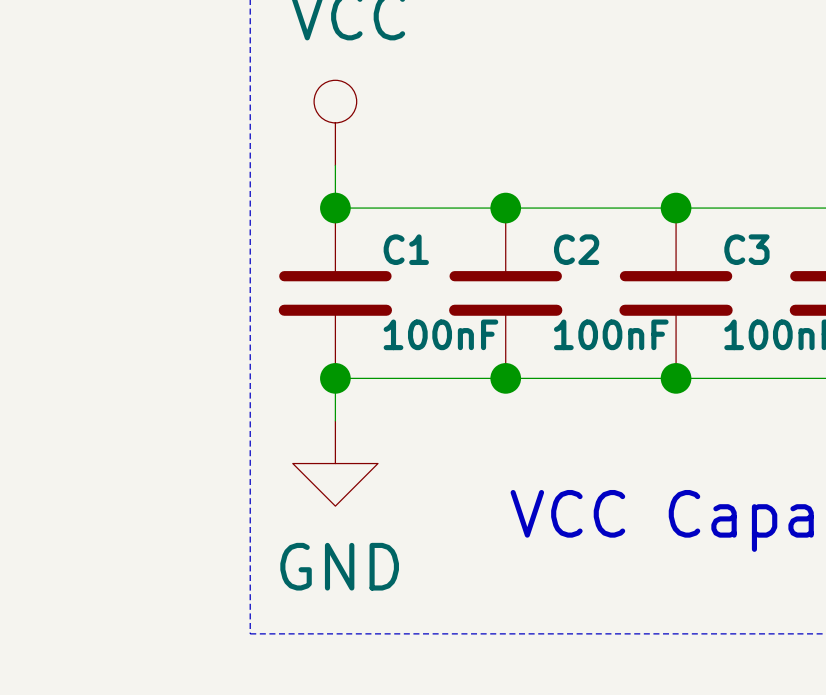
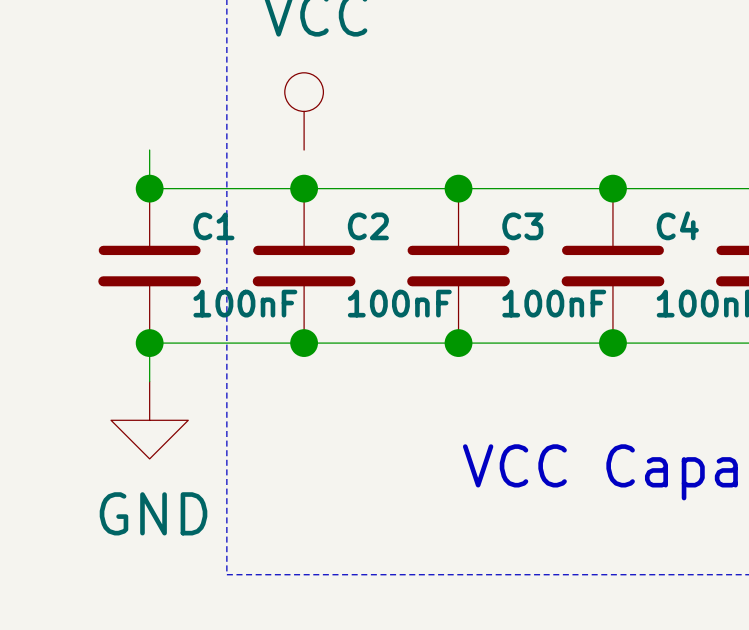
wire: (335, 165) (335, 208) -> (149, 150) (149, 188) (304, 188)
junction: none -> (149, 188)
C1 name: C1 (406, 249) -> C2 (368, 226)
C2 name: C2 (576, 249) -> C3 (522, 226)
C3 name: C3 (746, 249) -> C4 (677, 225)
C1: none -> 100nF (149, 265)
junction: none -> (149, 343)
wire: (335, 378) (335, 420) -> (304, 343) (149, 343) (149, 381)
power symbol position: GND (335, 463) -> GND (149, 420)

